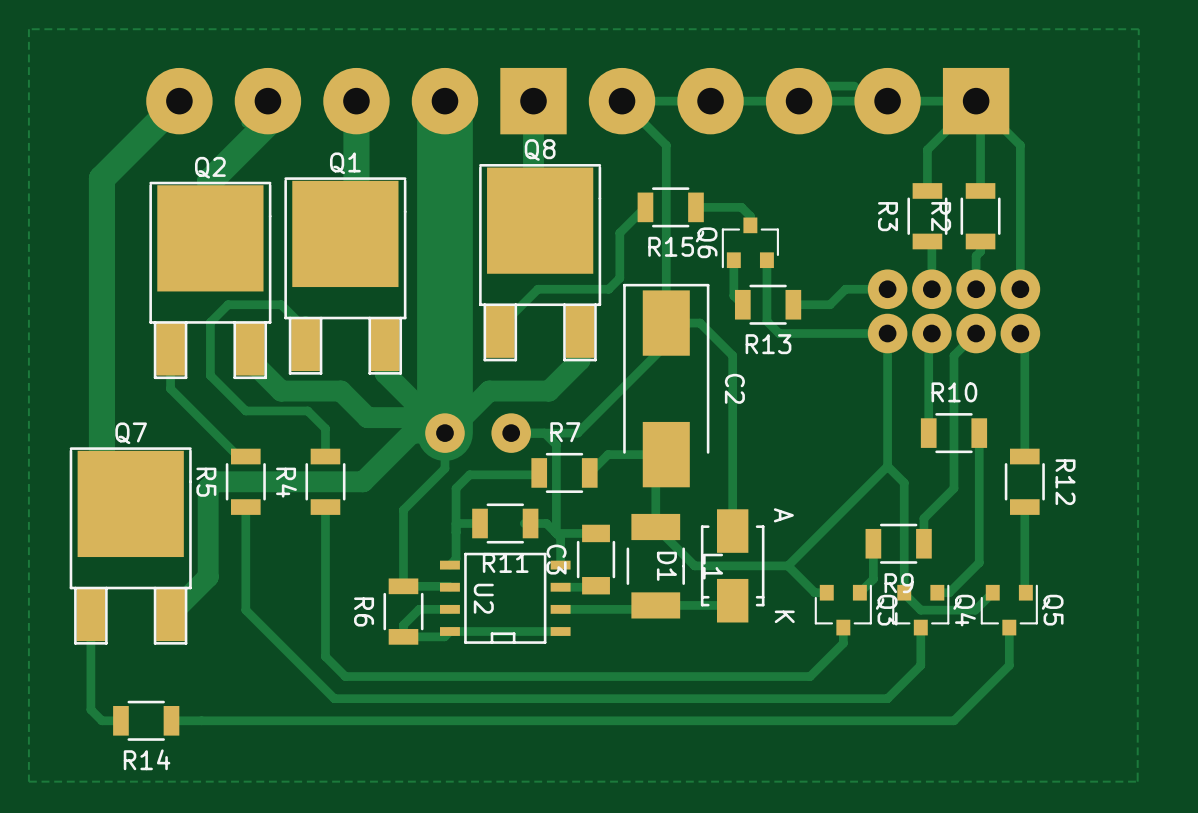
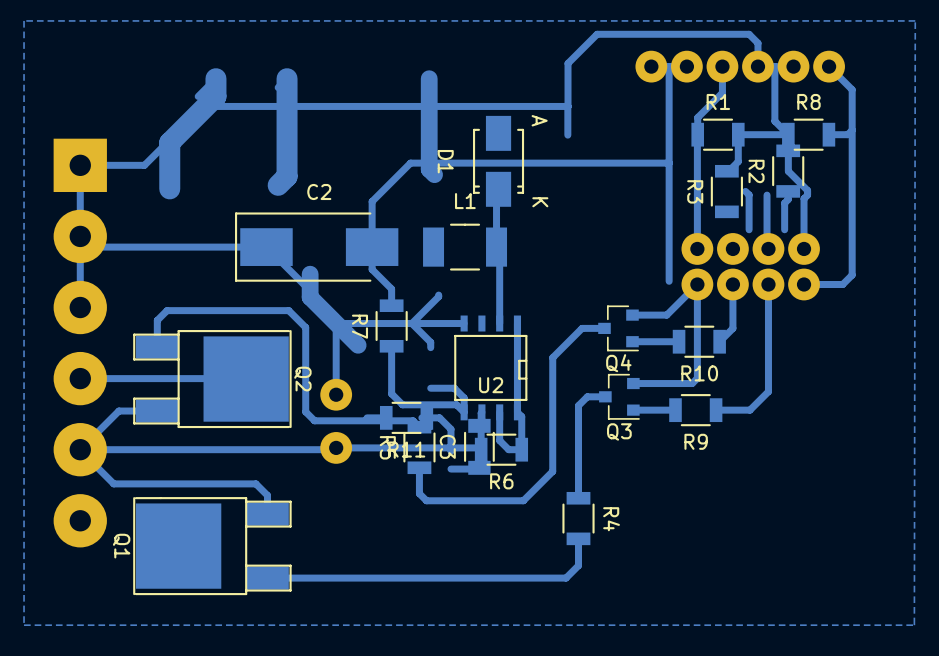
track: none -> (669, 66) (669, 281)
track: none -> (722, 66) (722, 92) (697, 117) (697, 248)
part: none -> (740, 66)
track: none -> (774, 66) (774, 121) (788, 134)
track: none -> (793, 66) (757, 66) (757, 43) (749, 34) (597, 34) (568, 63) (568, 106) (203, 106) (144, 165) (80, 165) (80, 307)
track: none -> (829, 66) (852, 89) (852, 275) (842, 284) (804, 284)
track: (168, 101) (179, 101) (101, 178) (101, 475) (130, 503) -> none
part: (356, 101) -> none
part: (799, 101) -> none
track: (976, 101) (927, 149) (927, 190) -> none
track: (976, 101) (1020, 145) (1020, 289) -> none
track: (976, 101) (622, 101) (666, 145) (666, 344) (577, 433) (511, 433) -> none
track: (980, 105) (980, 190) -> none
track: (444, 114) (444, 101) (444, 433) (444, 468) (403, 510) (403, 586) (449, 587) -> none
track: none -> (567, 106) (567, 135)
track: none -> (852, 130) (847, 134) (828, 134)
R1: none -> (718, 134)
track: none -> (788, 134) (788, 171) (807, 190) (807, 195) (804, 198) (804, 248)
track: none -> (788, 134) (738, 134) (738, 161) (732, 167)
R8: none -> (808, 134)
track: none -> (669, 163) (410, 163) (372, 201) (372, 269) (391, 289) (391, 305)
track: (645, 207) (619, 233) (619, 278) (608, 289) (537, 289) (500, 326) (500, 331) -> none
R15: (670, 207) -> none
track: (695, 207) (741, 207) (750, 216) (750, 225) -> none
R3 position: (927, 216) -> (726, 191)
track: none -> (498, 189) (496, 191) (496, 247) (499, 250) (499, 323)
Q6: (750, 242) -> none
track: none -> (767, 195) (768, 248)
track: (733, 260) (733, 295) (742, 304) -> none
track: (766, 260) (766, 321) (779, 333) (887, 333) (887, 466) -> none
Q8: (540, 262) -> none
Q1 rotation: 0° (345, 275) -> 90° counterclockwise (212, 546)
Q1 position: (345, 275) -> (212, 546)
Q2 rotation: 0° (210, 280) -> 90° clockwise (212, 379)
Q2 position: (210, 280) -> (212, 379)
track: (887, 289) (845, 289) (830, 304) (793, 304) -> none
track: none -> (80, 236) (90, 247) (266, 247) (336, 316) (336, 394)
R13: (768, 304) -> none
part position: (953, 311) -> (750, 266)
track: (666, 323) (700, 323) (732, 355) (732, 531) -> none
track: (305, 329) (281, 304) (228, 304) (210, 322) (210, 375) (245, 410) (307, 410) (325, 428) (325, 456) -> none
track: (579, 331) (579, 360) (548, 391) (489, 391) (447, 433) (411, 433) (363, 481) (214, 481) (208, 488) (208, 576) (170, 614) (170, 601) -> none
track: (931, 333) (928, 336) (928, 433) -> none
track: (976, 333) (953, 355) (953, 488) (923, 518) (923, 543) -> none
track: (1020, 333) (1024, 337) (1024, 456) -> none
track: (170, 349) (170, 388) (238, 456) (245, 456) -> none
track: none -> (732, 284) (732, 328) (719, 341)
track: none -> (768, 284) (768, 391) (749, 410) (716, 410)
track: none -> (438, 295) (411, 323) (430, 342) (430, 347)
track: (250, 371) (250, 349) (250, 360) (281, 391) (340, 391) (367, 417) (429, 417) -> none
C2 rotation: 0° (666, 385) -> 90° counterclockwise (316, 247)
C2 position: (666, 385) -> (316, 247)
R10 name position: R10 (954, 392) -> R10 (699, 373)
track: none -> (632, 315) (666, 315) (697, 284) (697, 378) (692, 383) (633, 383)
track: none -> (336, 320) (339, 323) (464, 323)
track: none -> (517, 323) (517, 412) (521, 416) (521, 449) (508, 449) (499, 440) (499, 412)
track: none -> (604, 328) (582, 328) (552, 357) (552, 471) (523, 500) (426, 500) (419, 493) (419, 467)
track: none -> (679, 341) (632, 341)
part: none -> (80, 343)
R7 name position: R7 (565, 432) -> R7 (359, 326)
part rotation: 0° (478, 433) -> 90° clockwise (336, 421)
part position: (478, 433) -> (336, 421)
track: (544, 433) (556, 444) (556, 533) (596, 533) -> none
R10 position: (953, 433) -> (699, 341)
track: (979, 433) (979, 562) (949, 592) (937, 592) -> none
track: none -> (391, 346) (391, 393) (402, 404) (456, 404) (464, 412) (464, 397) (454, 388) (430, 388)
track: none -> (157, 347) (157, 320) (167, 310) (288, 310) (305, 327) (305, 411) (314, 420) (413, 420) (419, 427)
track: (887, 466) (904, 482) (904, 593) (920, 610) (975, 610) (992, 592) -> none
track: (887, 466) (788, 565) -> none
R7 rotation: 0° (564, 472) -> 90° clockwise (391, 326)
R7 position: (564, 472) -> (391, 326)
track: (589, 472) (608, 454) (666, 454) (655, 465) (655, 527) (694, 565) (788, 565) -> none
track: none -> (80, 378) (246, 379)
track: (532, 474) (469, 474) (456, 488) (456, 559) (449, 565) -> none
R5 position: (245, 481) -> (419, 447)
R4 position: (325, 481) -> (578, 518)
R12: (1024, 481) -> none
R4 name position: R4 (286, 482) -> R4 (611, 519)
track: none -> (605, 396) (587, 396) (578, 405) (578, 498)
track: (245, 507) (245, 610) (334, 698) (887, 698) (920, 665) (920, 627) -> none
track: (325, 507) (325, 656) (345, 676) (810, 676) (843, 643) (843, 627) -> none
track: (1024, 507) (1025, 592) -> none
track: none -> (675, 410) (633, 410)
track: none -> (157, 411) (118, 411) (80, 449)
track: none -> (481, 412) (481, 449) (479, 447) (80, 449)
track: (873, 543) (873, 579) (859, 592) -> none
R9 position: (898, 543) -> (695, 410)
Q7: (130, 545) -> none
track: none -> (80, 449) (113, 483) (255, 483) (267, 495) (267, 514)
D1 position: (732, 565) -> (498, 161)
track: (788, 565) (814, 592) (826, 592) -> none
L1 rotation: 0° (655, 566) -> 90° counterclockwise (465, 247)
L1 position: (655, 566) -> (465, 247)
U2 rotation: 0° (505, 598) -> 90° counterclockwise (490, 367)
U2 position: (505, 598) -> (490, 367)
track: (732, 600) (727, 605) (655, 605) (651, 609) (560, 609) -> none
track: (449, 609) (419, 609) (403, 625) (403, 636) (444, 636) (449, 631) (560, 631) -> none
Q3 rotation: 0° (843, 610) -> 90° clockwise (619, 396)
Q3 position: (843, 610) -> (619, 396)
Q4 rotation: 0° (920, 610) -> 90° clockwise (618, 328)
Q4 position: (920, 610) -> (618, 328)
Q5: (1009, 610) -> none
R6 rotation: 0° (403, 611) -> 90° clockwise (501, 449)
R6 position: (403, 611) -> (501, 449)
R6 name position: R6 (364, 612) -> R6 (501, 481)
track: (90, 614) (90, 709) (101, 720) (120, 720) -> none
track: (1009, 627) (1009, 665) (953, 720) (171, 720) -> none
track: none -> (578, 538) (578, 565) (566, 578) (267, 578)
R14: (146, 720) -> none

